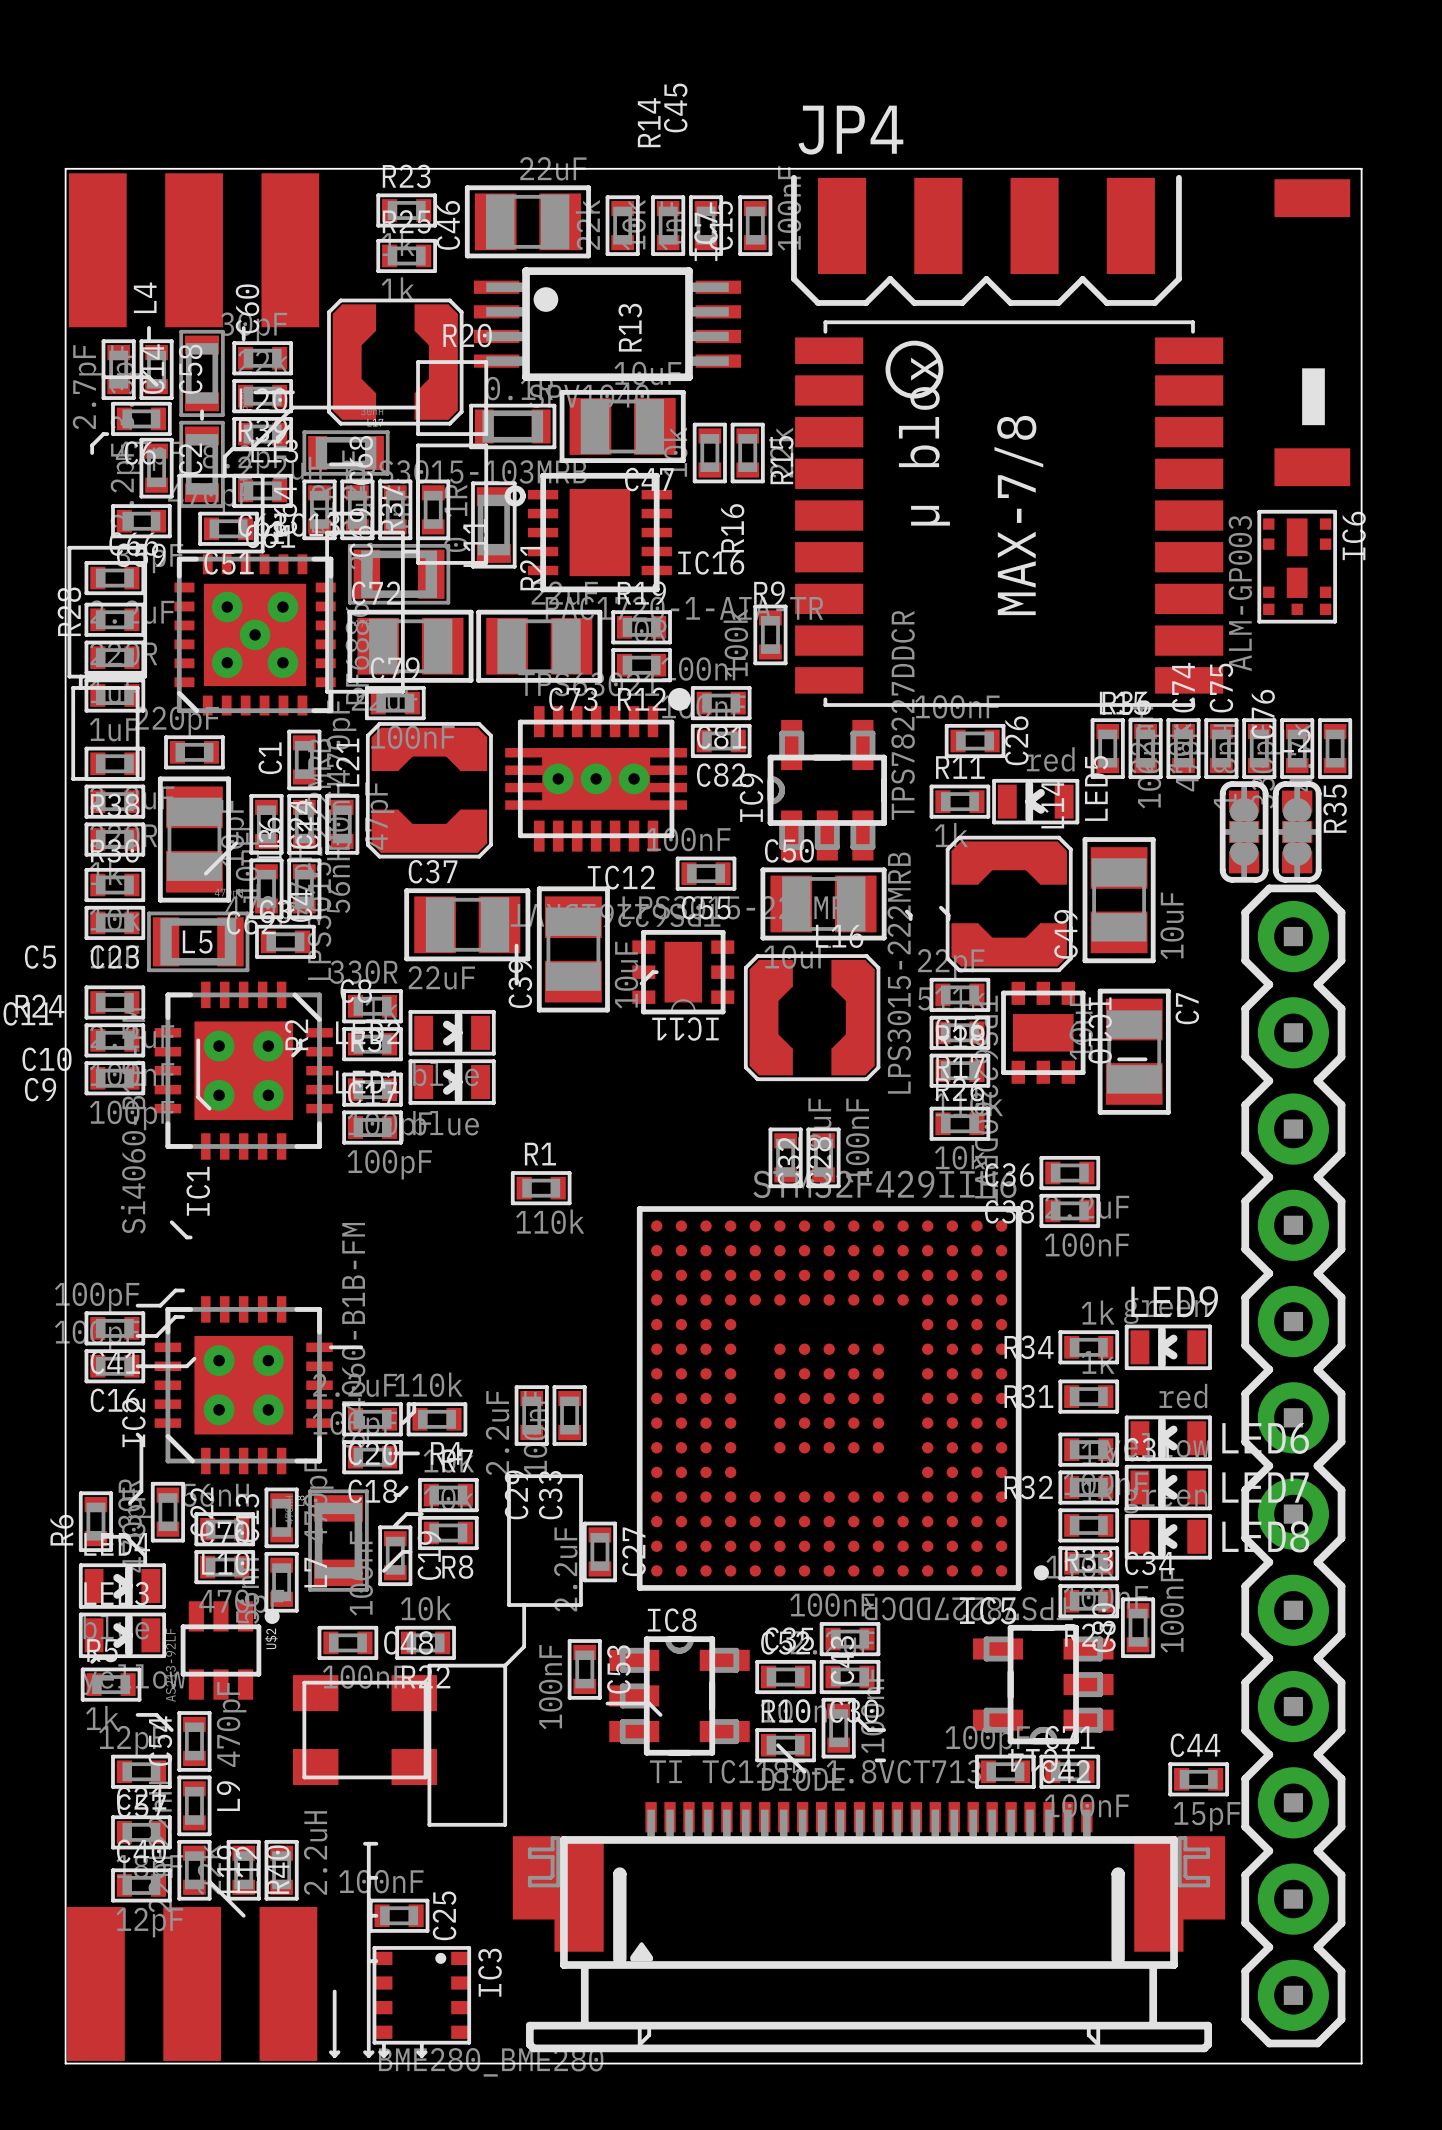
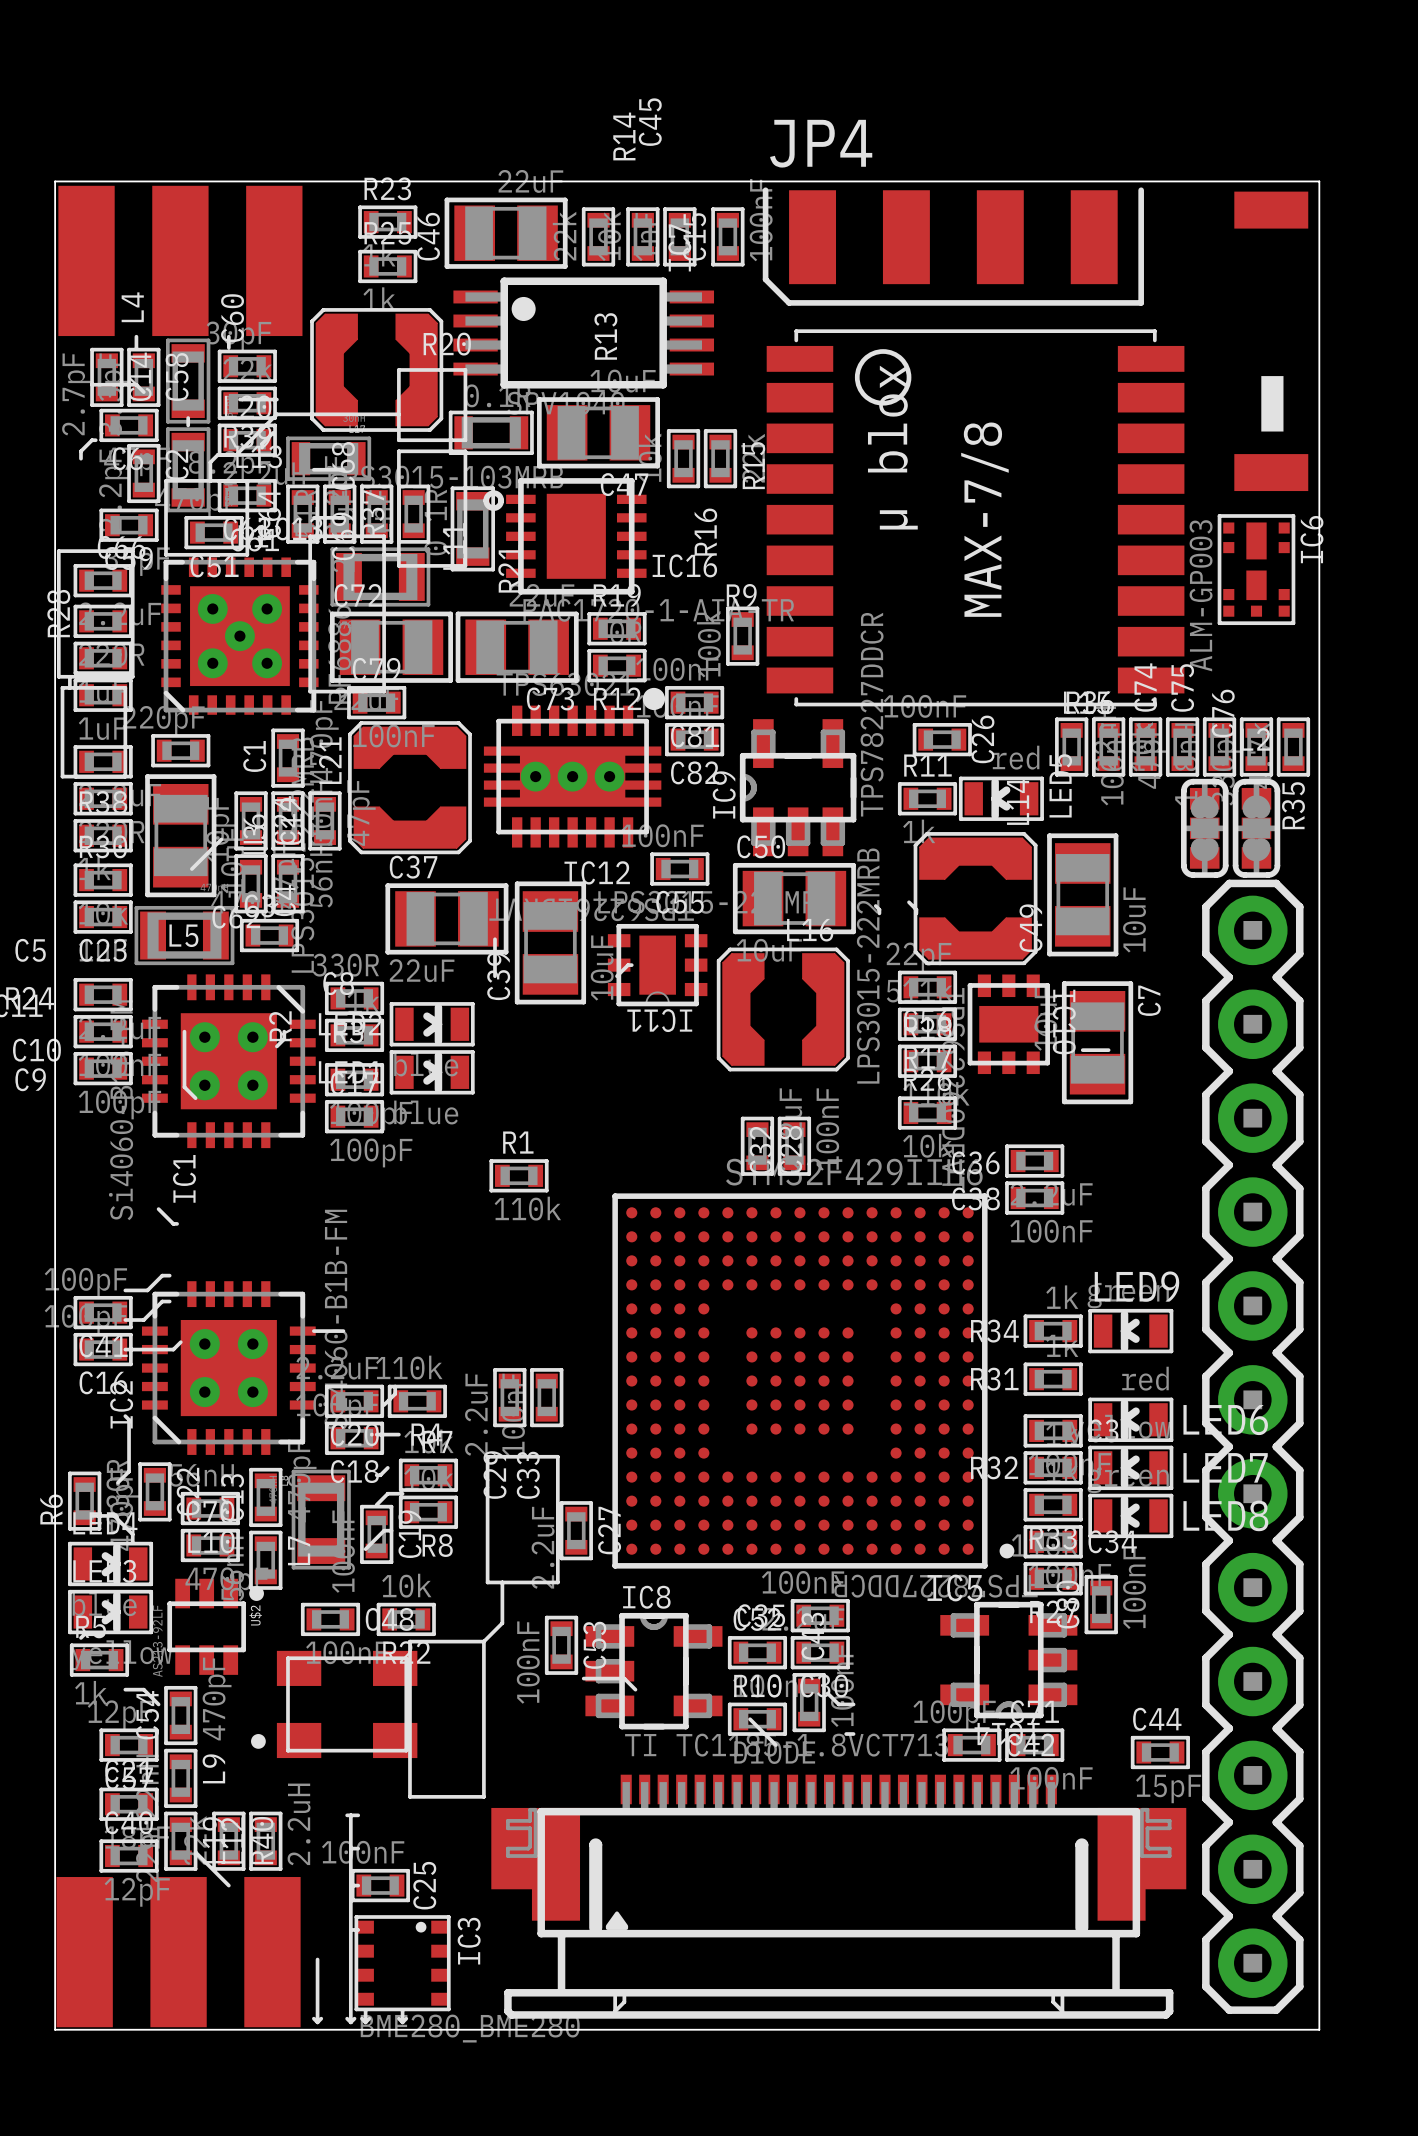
JP4 footprint: [791, 174, 1182, 306] -> [762, 187, 1144, 306]
part footprint: [292, 1675, 437, 1786] -> [251, 1650, 418, 1759]

